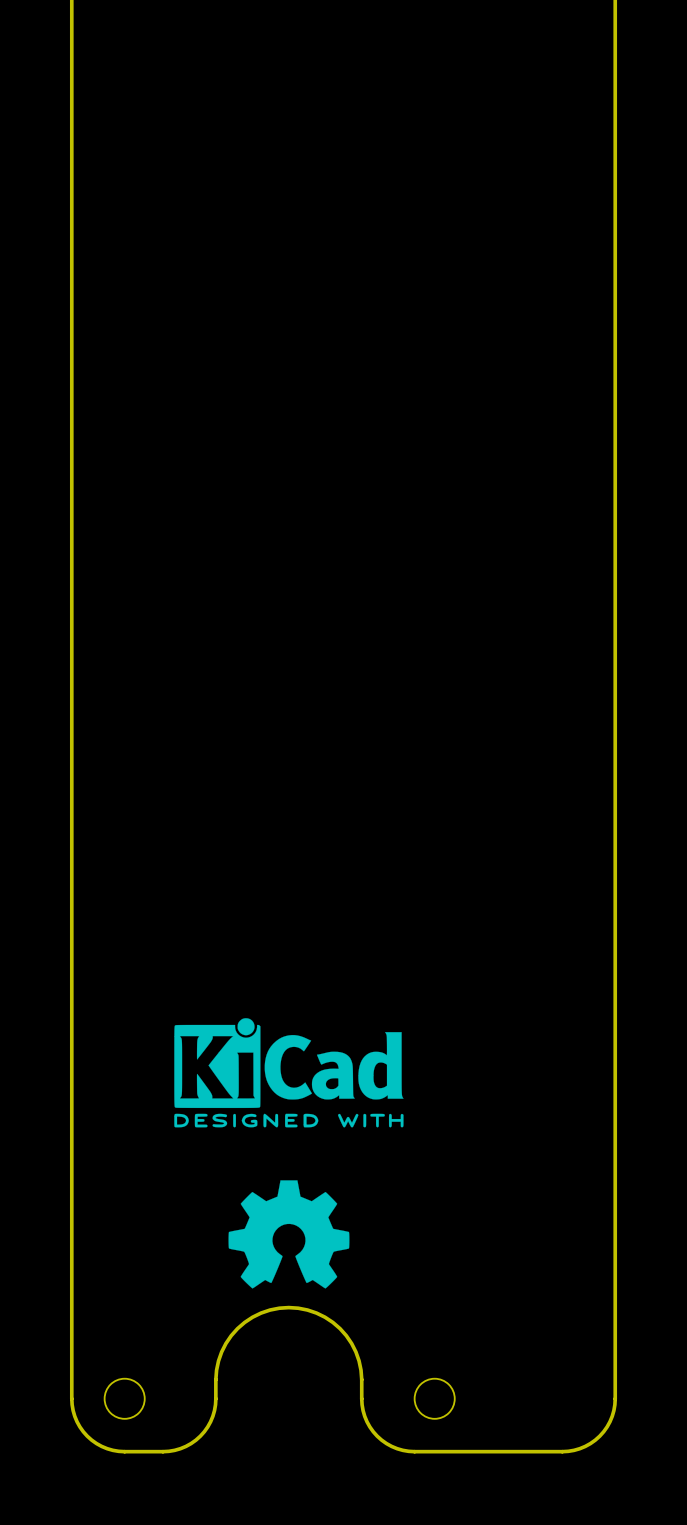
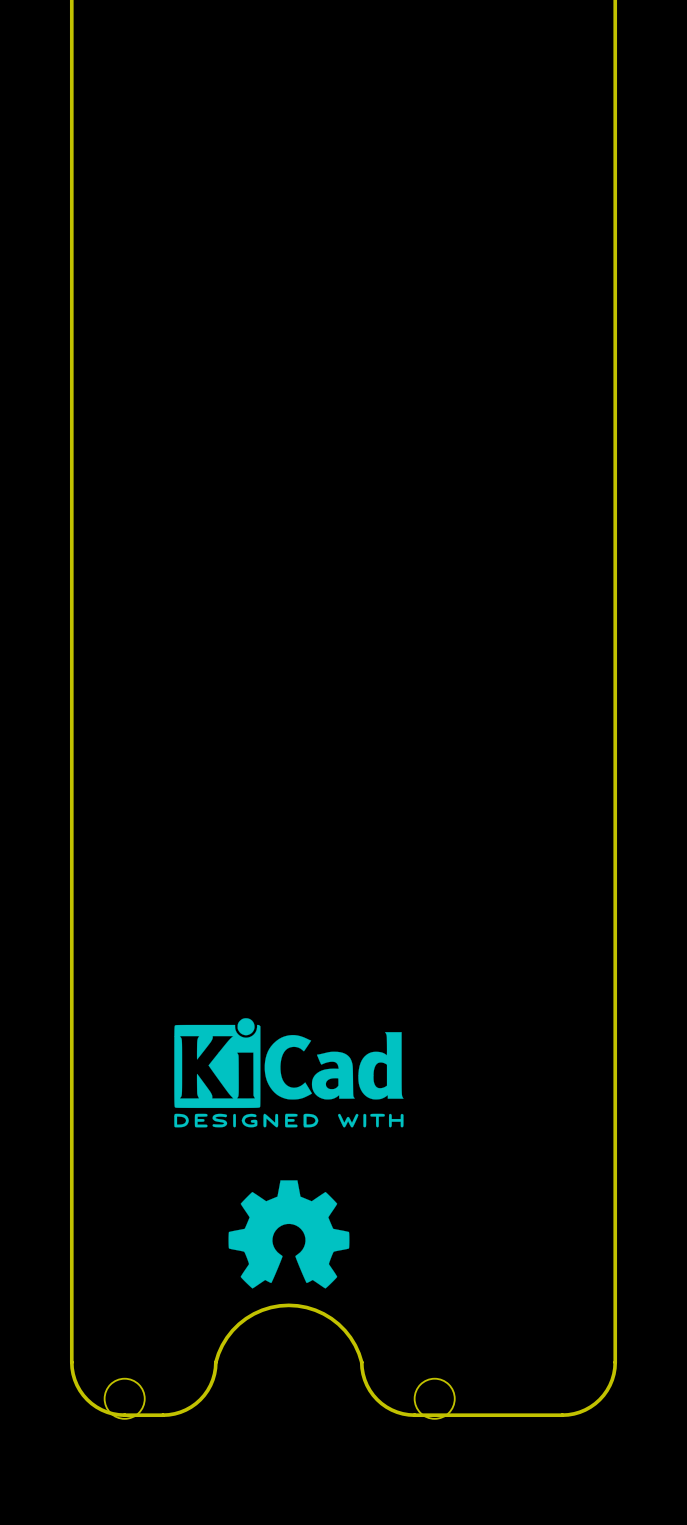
board edge: (615, 1362) (614, 1404) (607, 1426) (595, 1440) (585, 1446) (562, 1451) (414, 1451) (391, 1446) (377, 1436) (364, 1416) (362, 1404) (361, 1370) (351, 1343) (332, 1322) (316, 1313) (298, 1308) (279, 1308) (261, 1313) (244, 1322) (231, 1335) (218, 1360) (215, 1404) (210, 1421) (195, 1440) (174, 1450) (118, 1451) (101, 1446) (91, 1440) (79, 1426) (73, 1410) (71, 1362) -> (615, 1362) (612, 1379) (603, 1395) (590, 1407) (574, 1413) (402, 1413) (386, 1407) (373, 1395) (364, 1379) (361, 1362) (355, 1345) (338, 1324) (315, 1310) (288, 1305) (262, 1310) (239, 1324) (222, 1345) (215, 1362) (212, 1379) (204, 1395) (191, 1407) (174, 1413) (124, 1415) (101, 1409) (87, 1399) (79, 1390) (73, 1374) (71, 1362)

